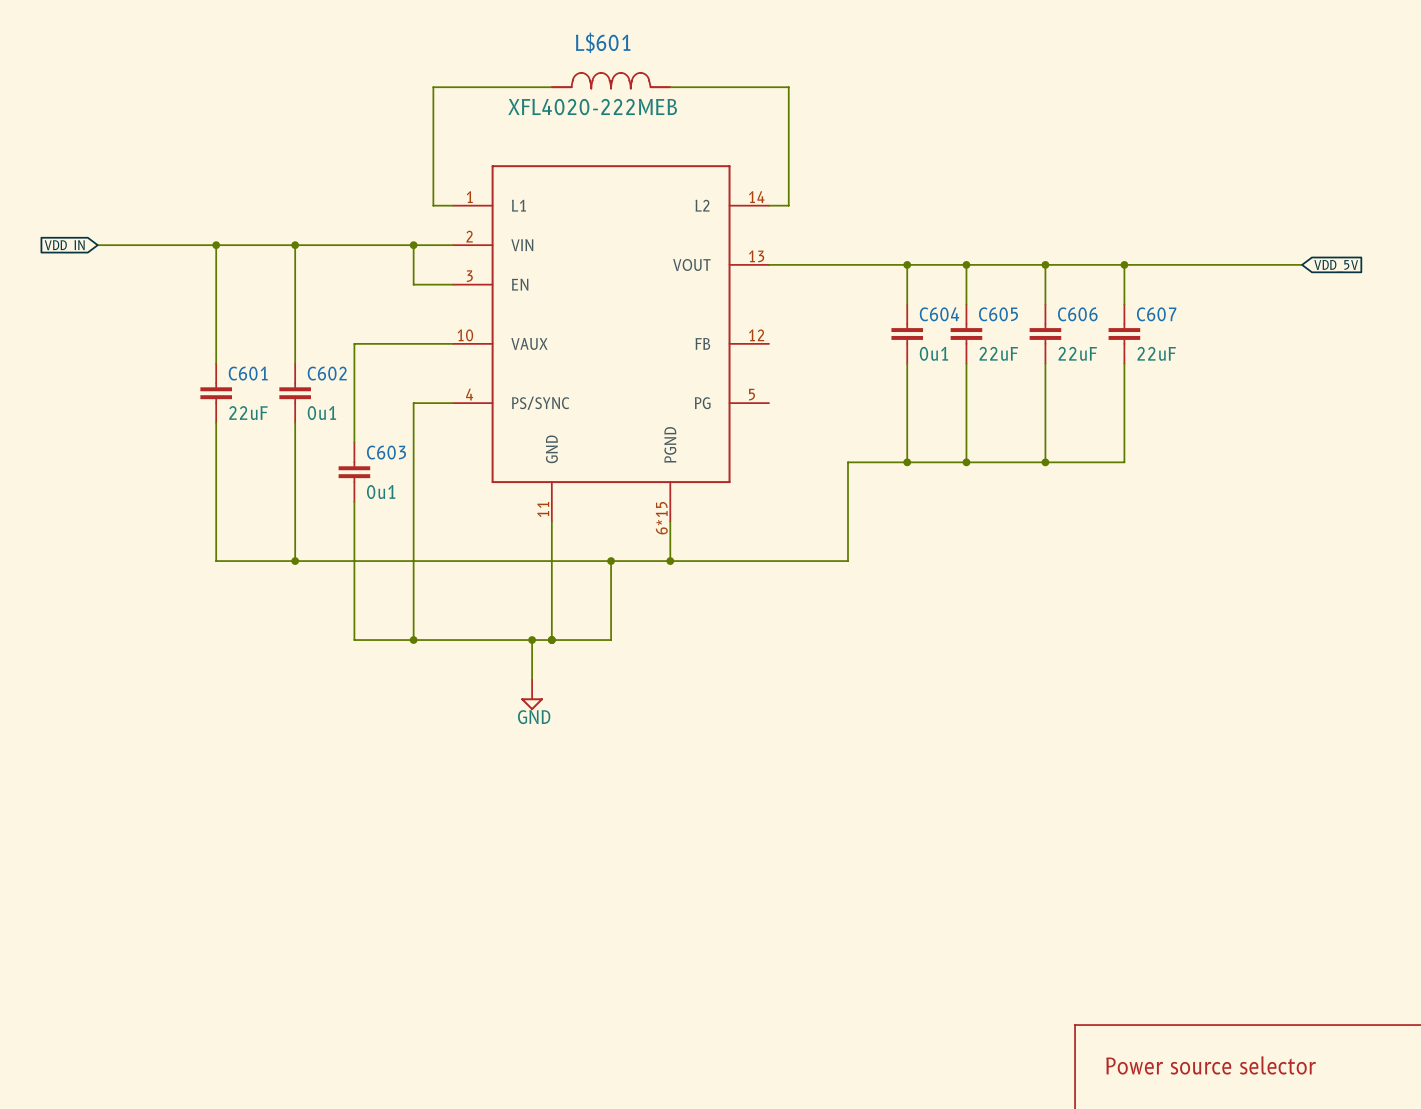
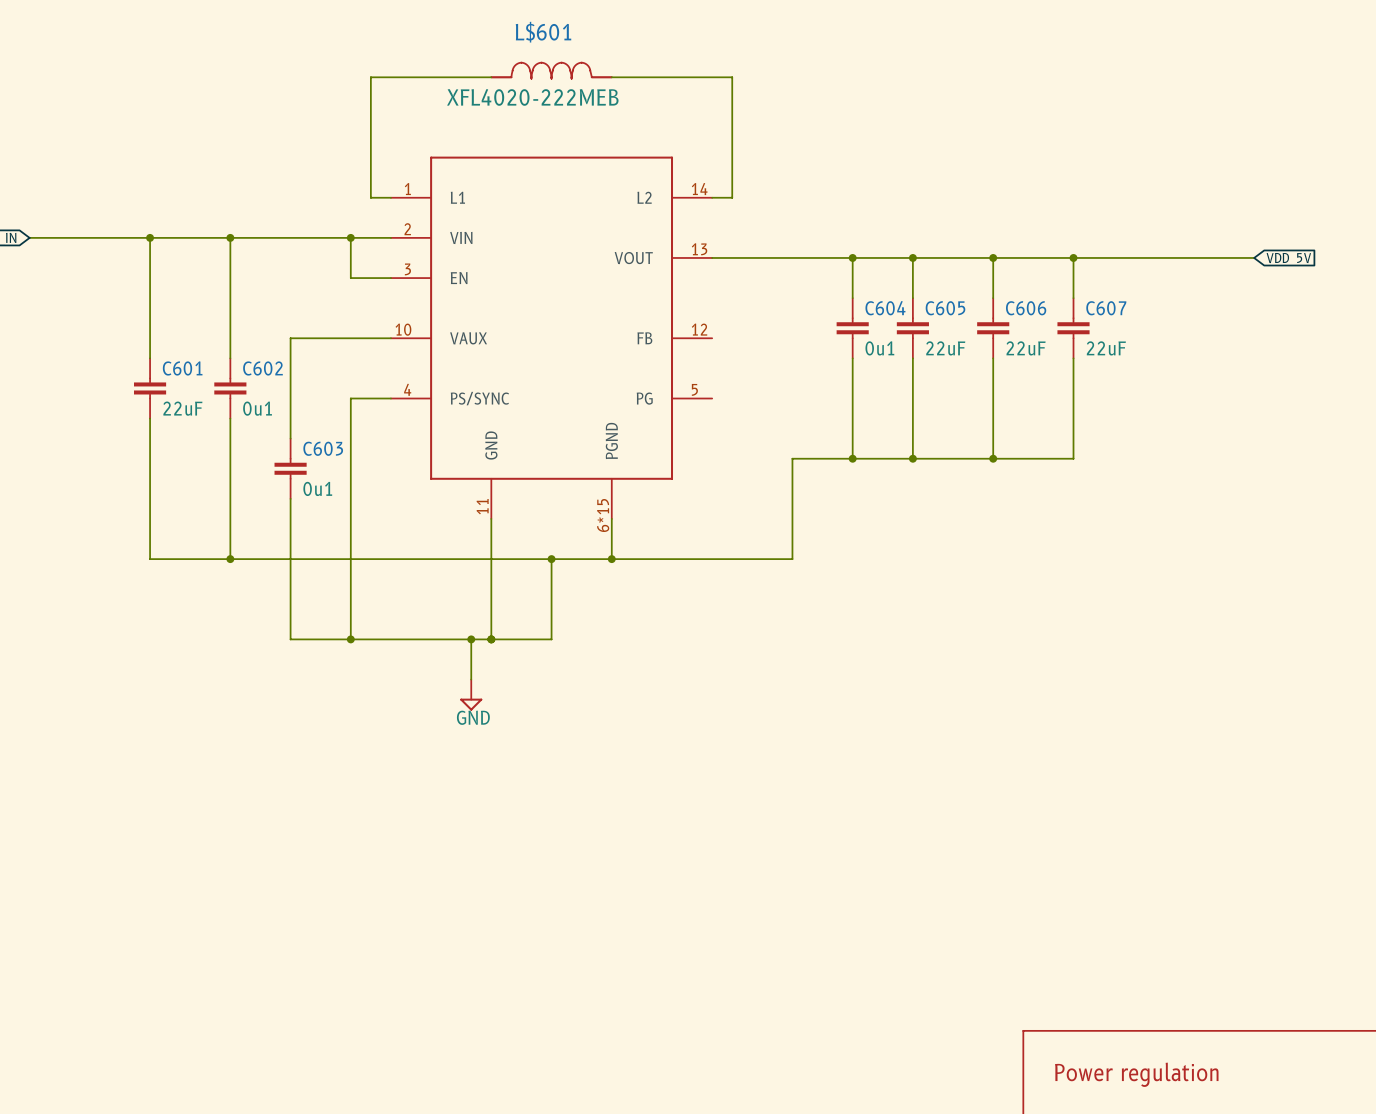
text: Power source selector (1211, 1065) -> Power regulation (1136, 1074)

